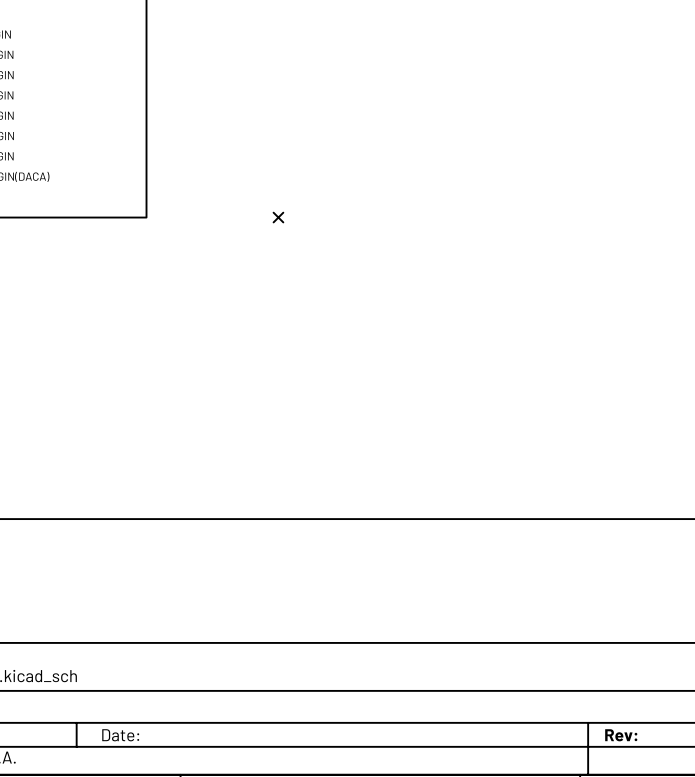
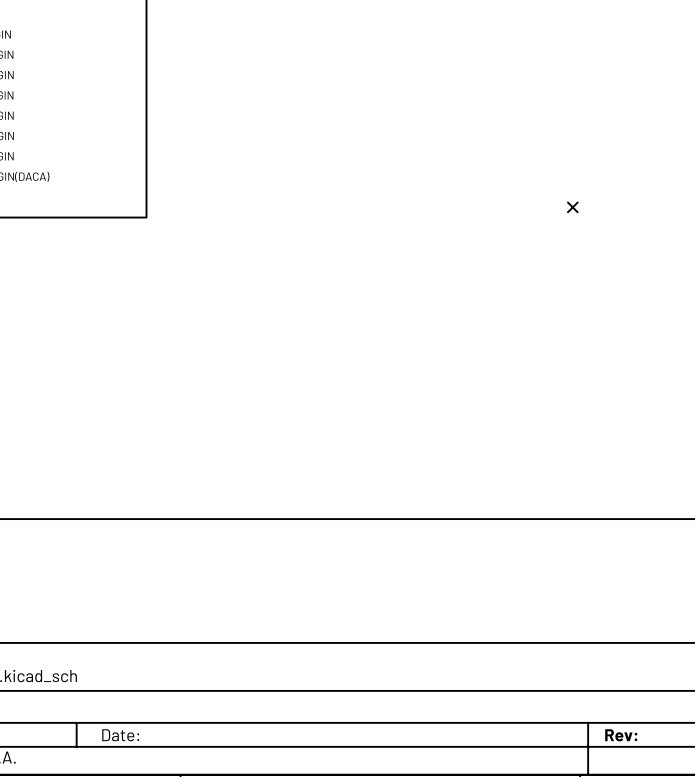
no-connect mark: none -> (572, 207)
no-connect mark: (278, 217) -> none

